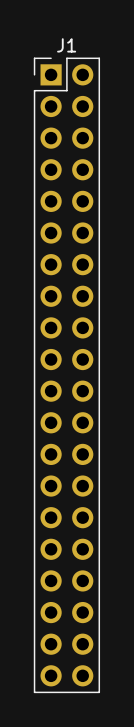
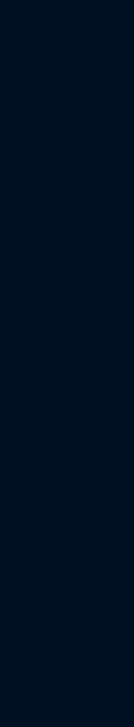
J1: (66, 375) -> none

